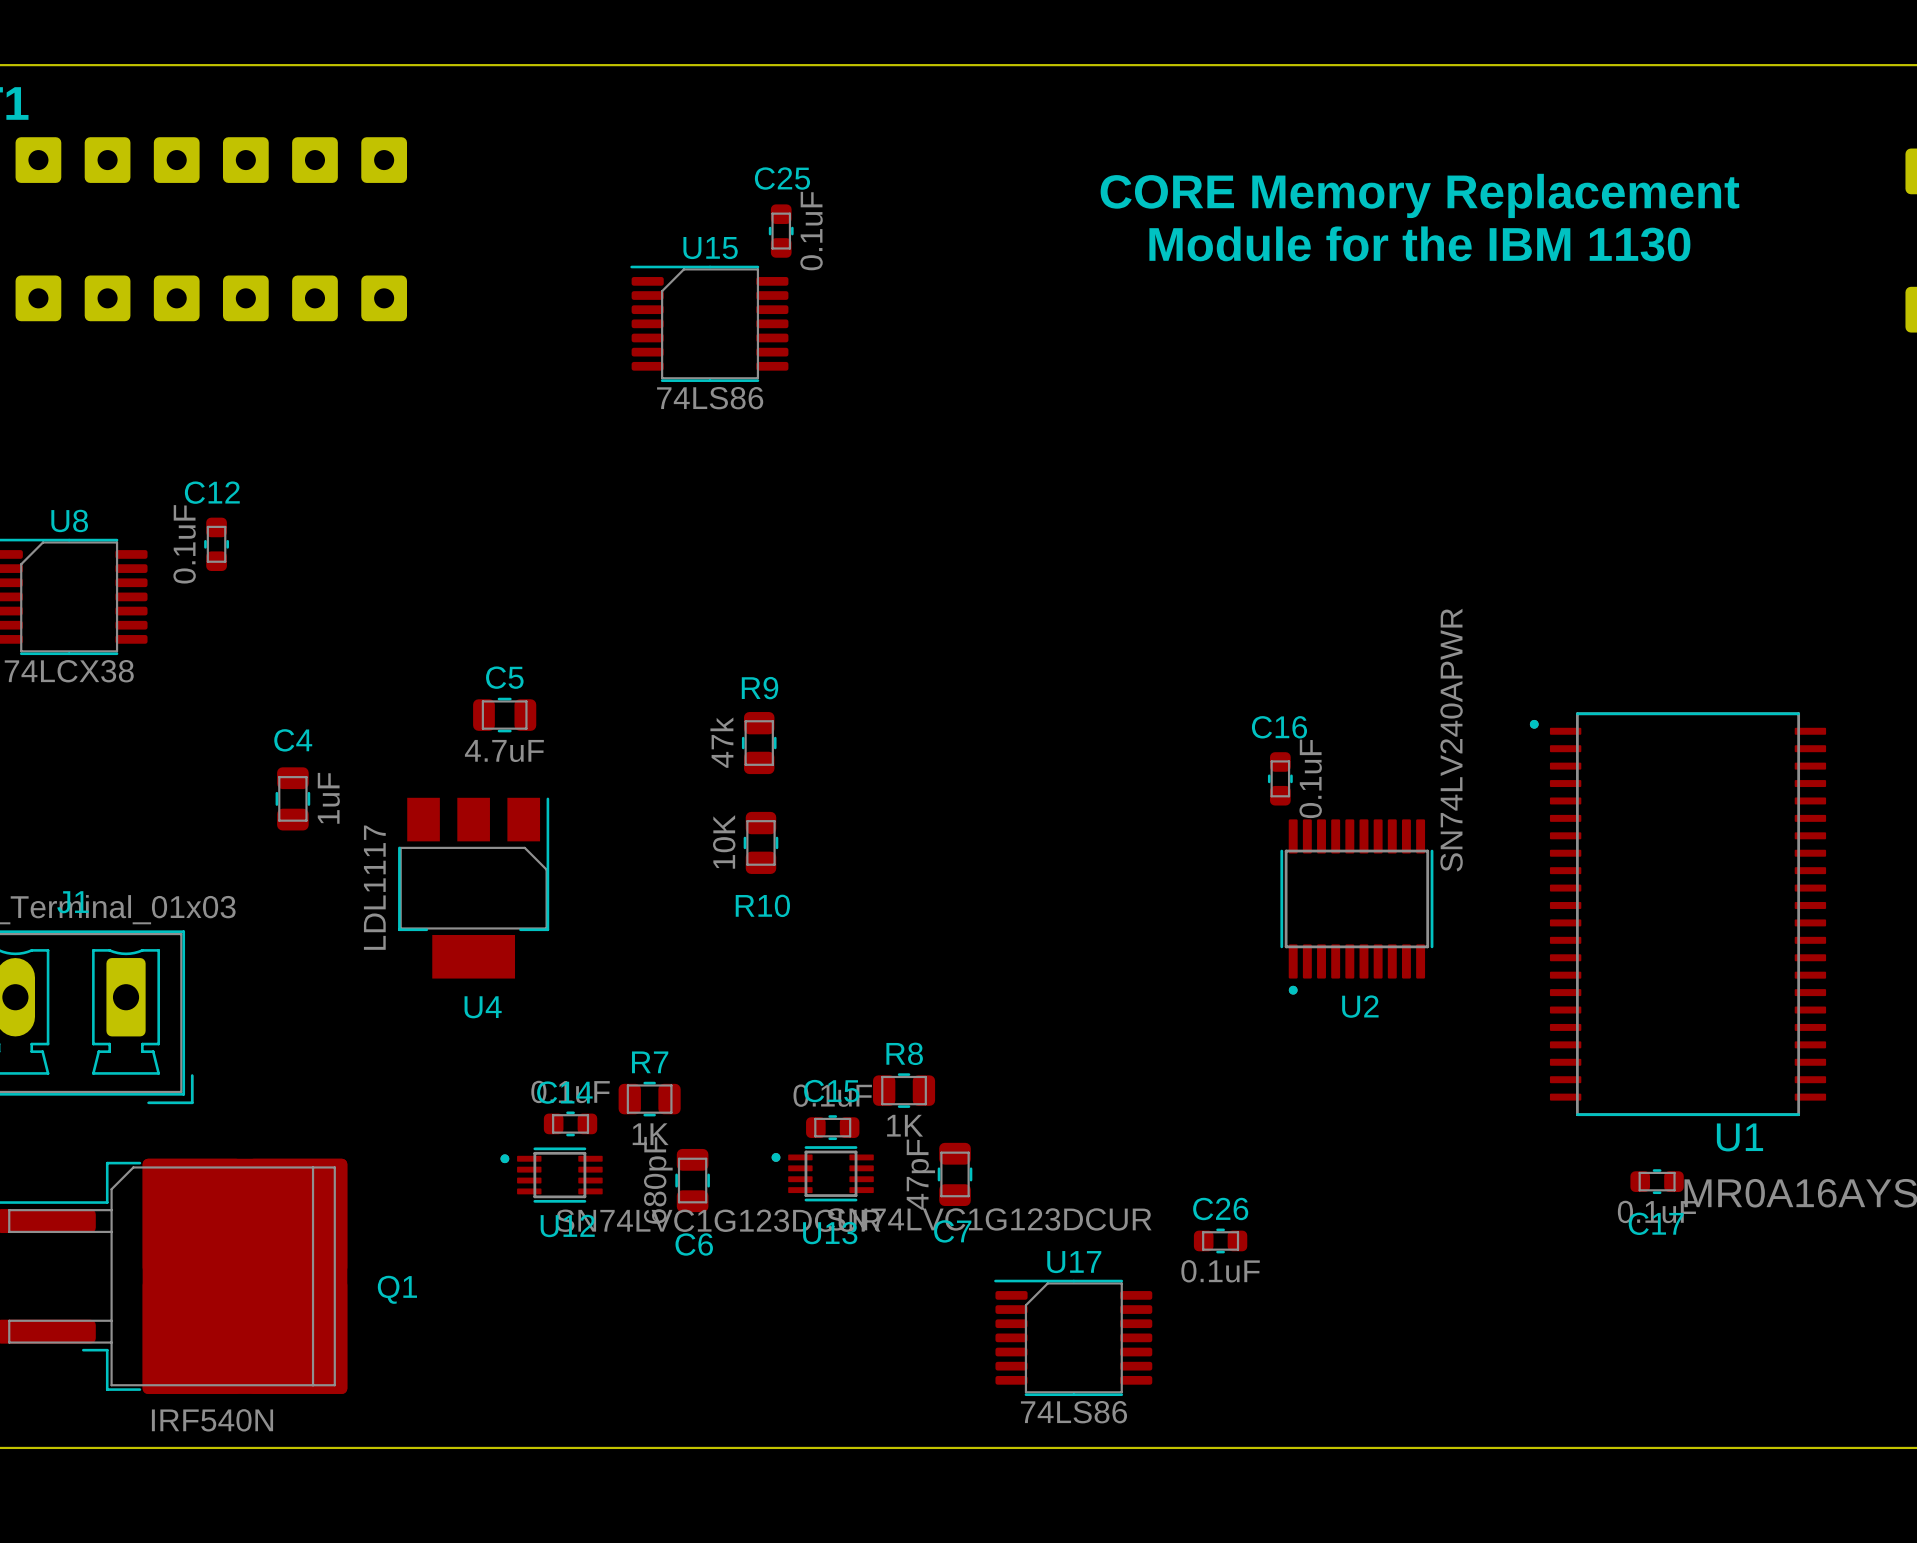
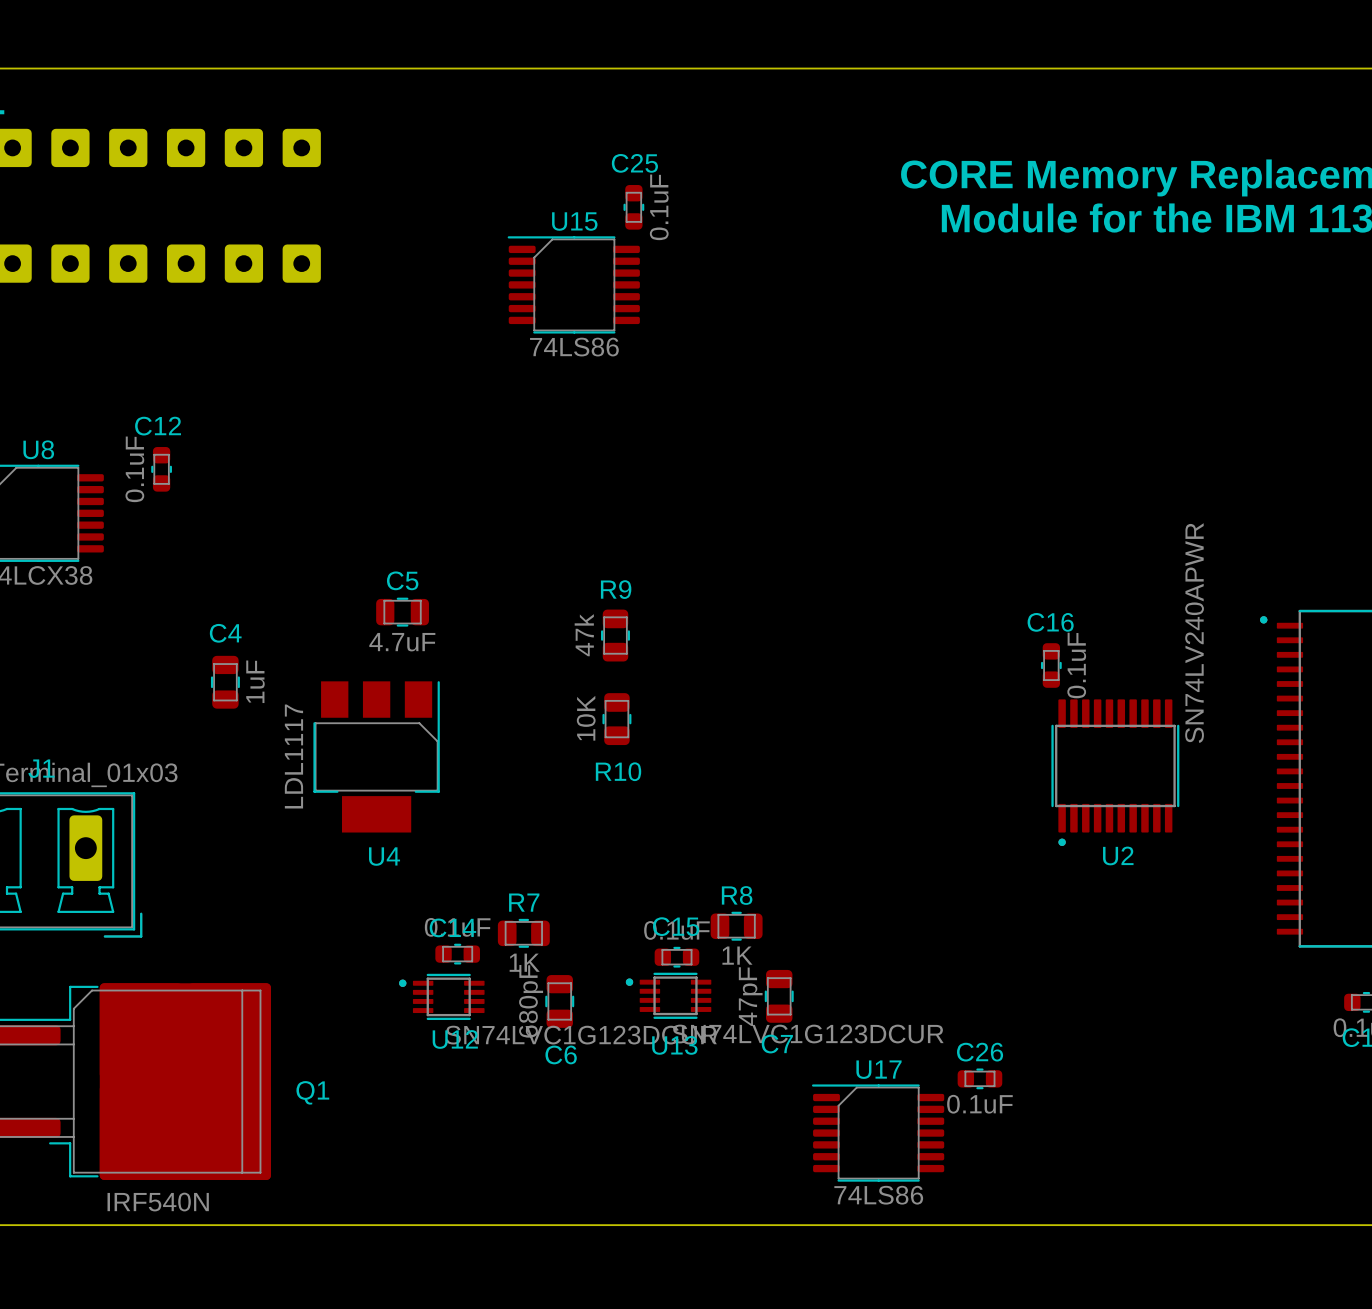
C26 position: (1220, 1240) -> (979, 1078)

